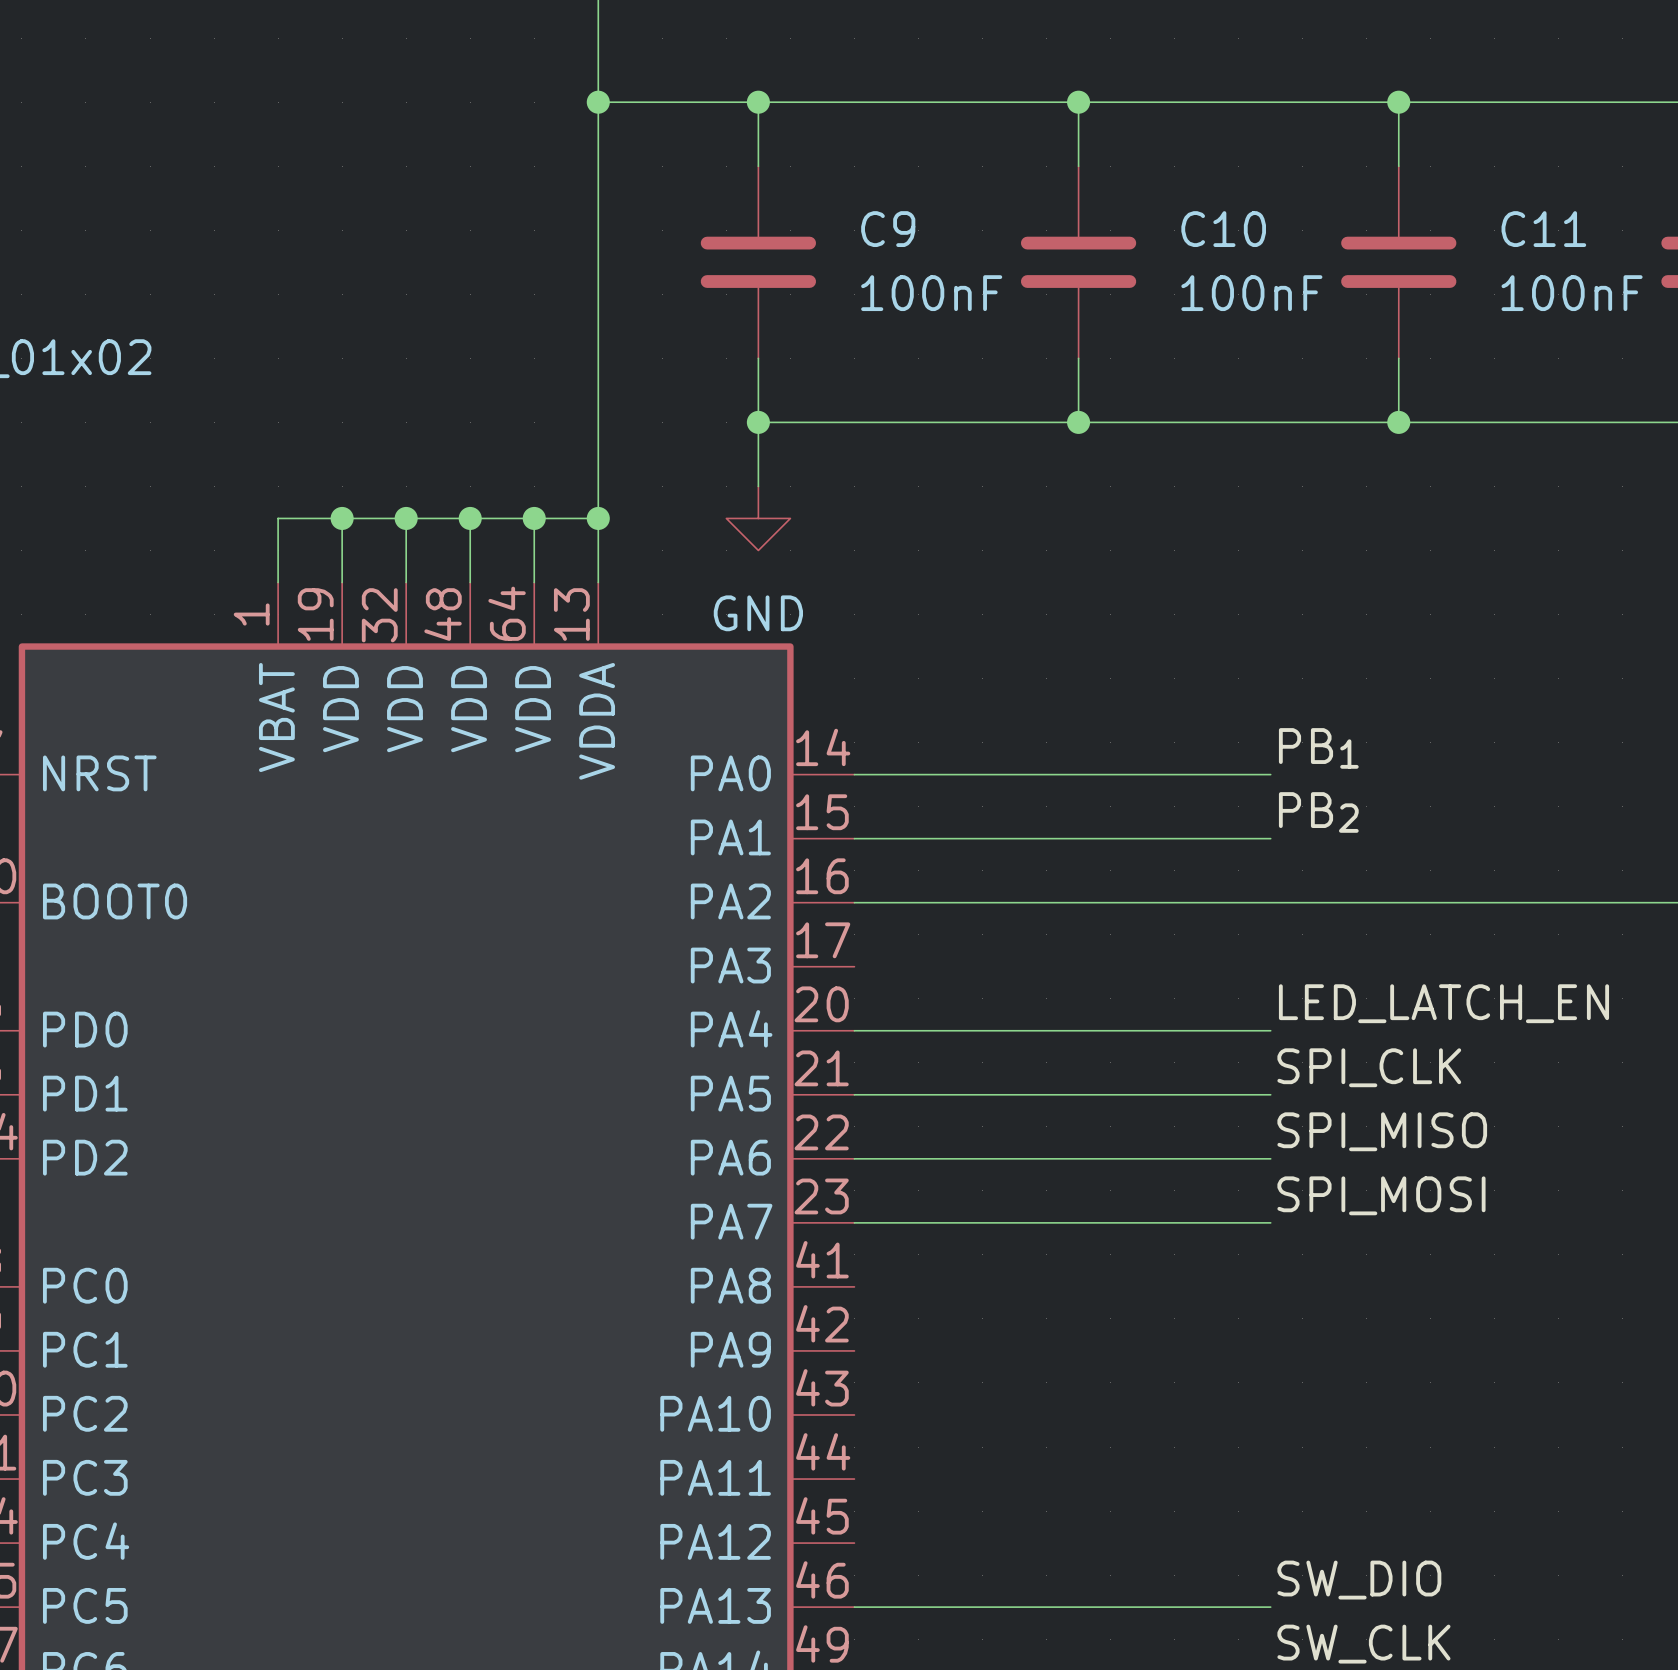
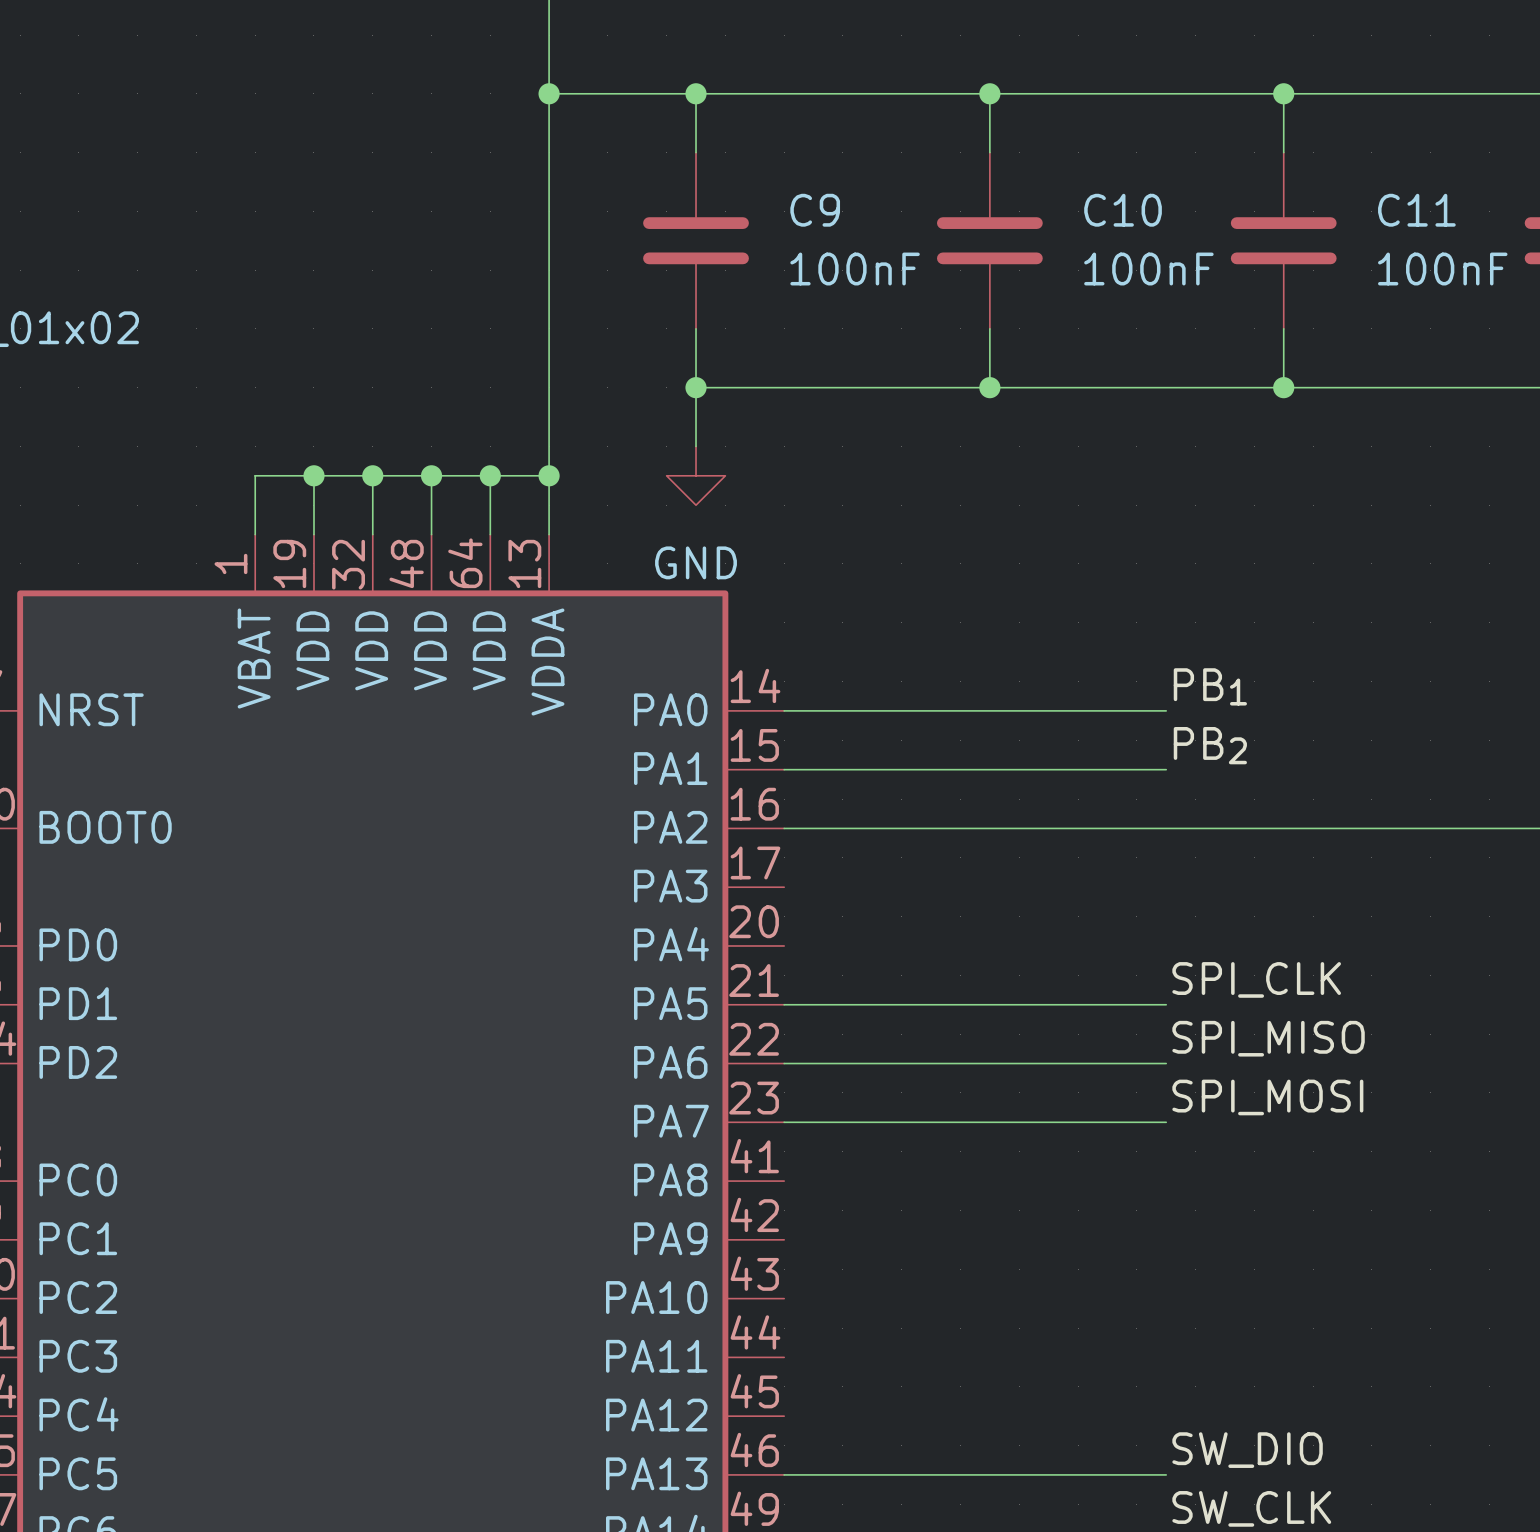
label: LED_LATCH_EN (1443, 1003) -> none
wire: (854, 1030) (1270, 1030) -> none

